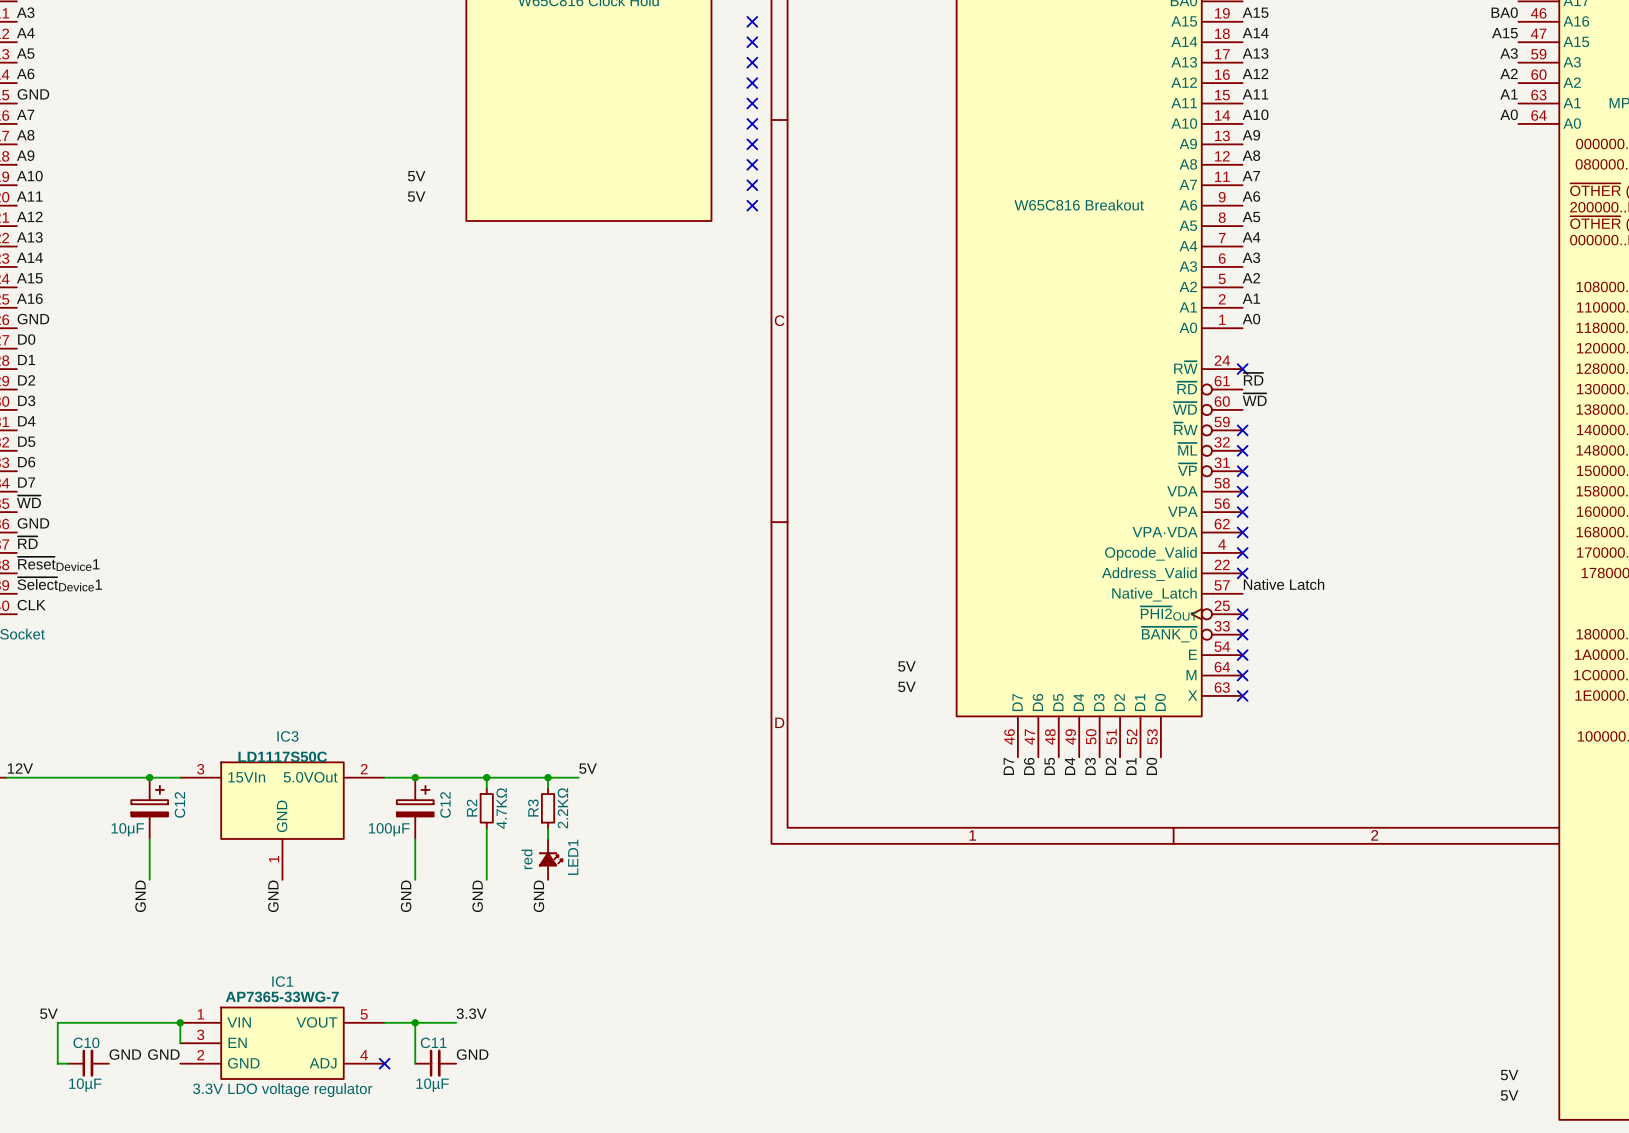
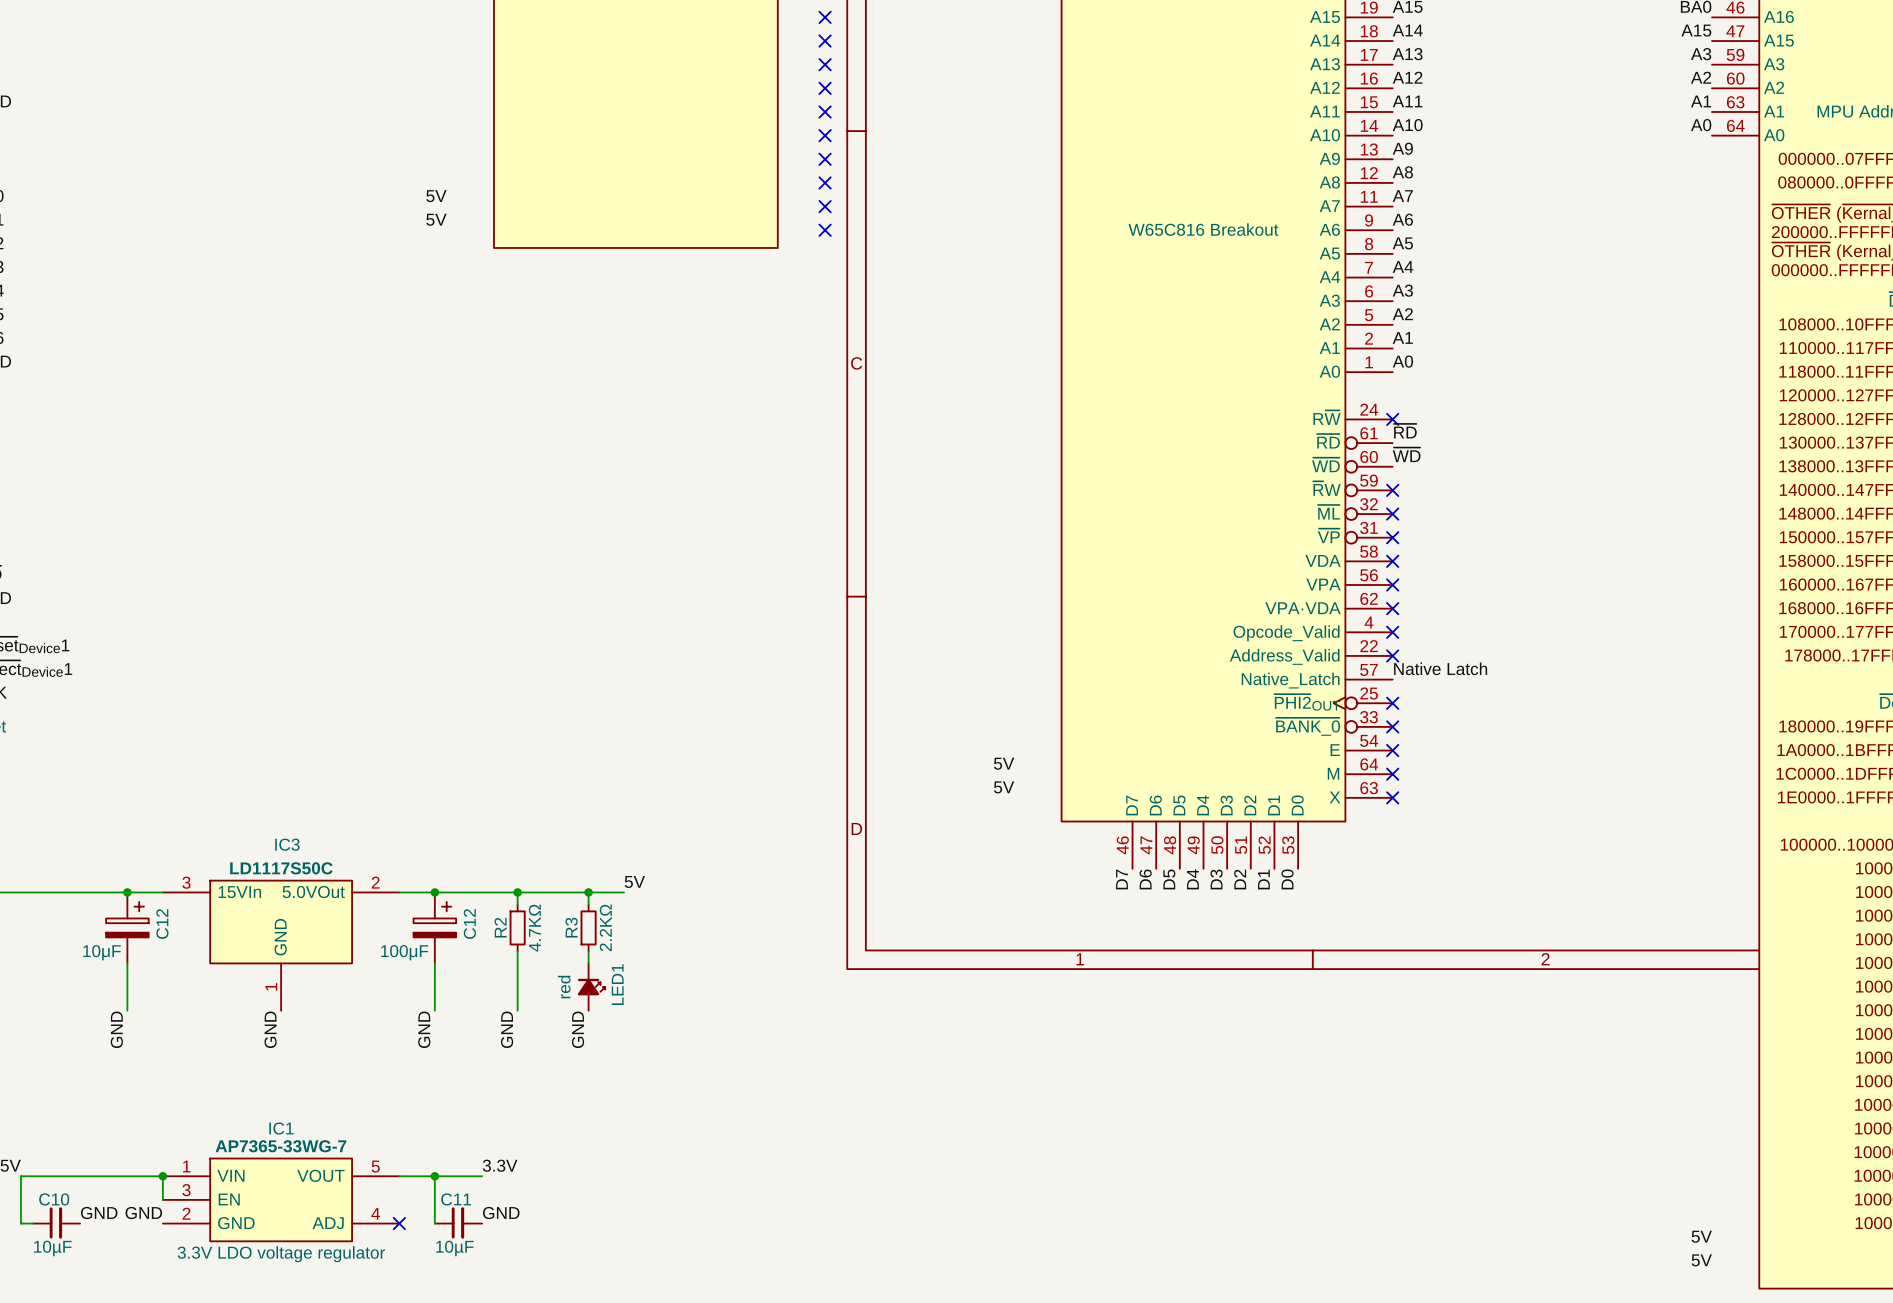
IC3 symbol: [180, 761, 385, 880] -> [162, 879, 400, 1011]

